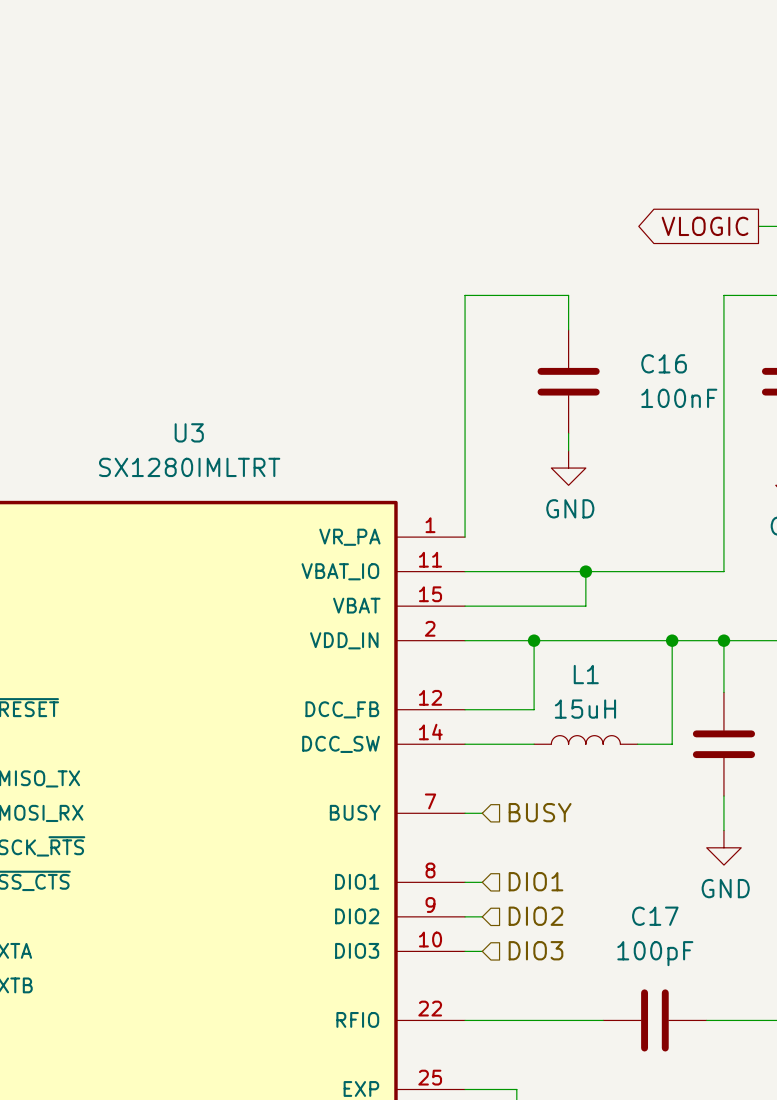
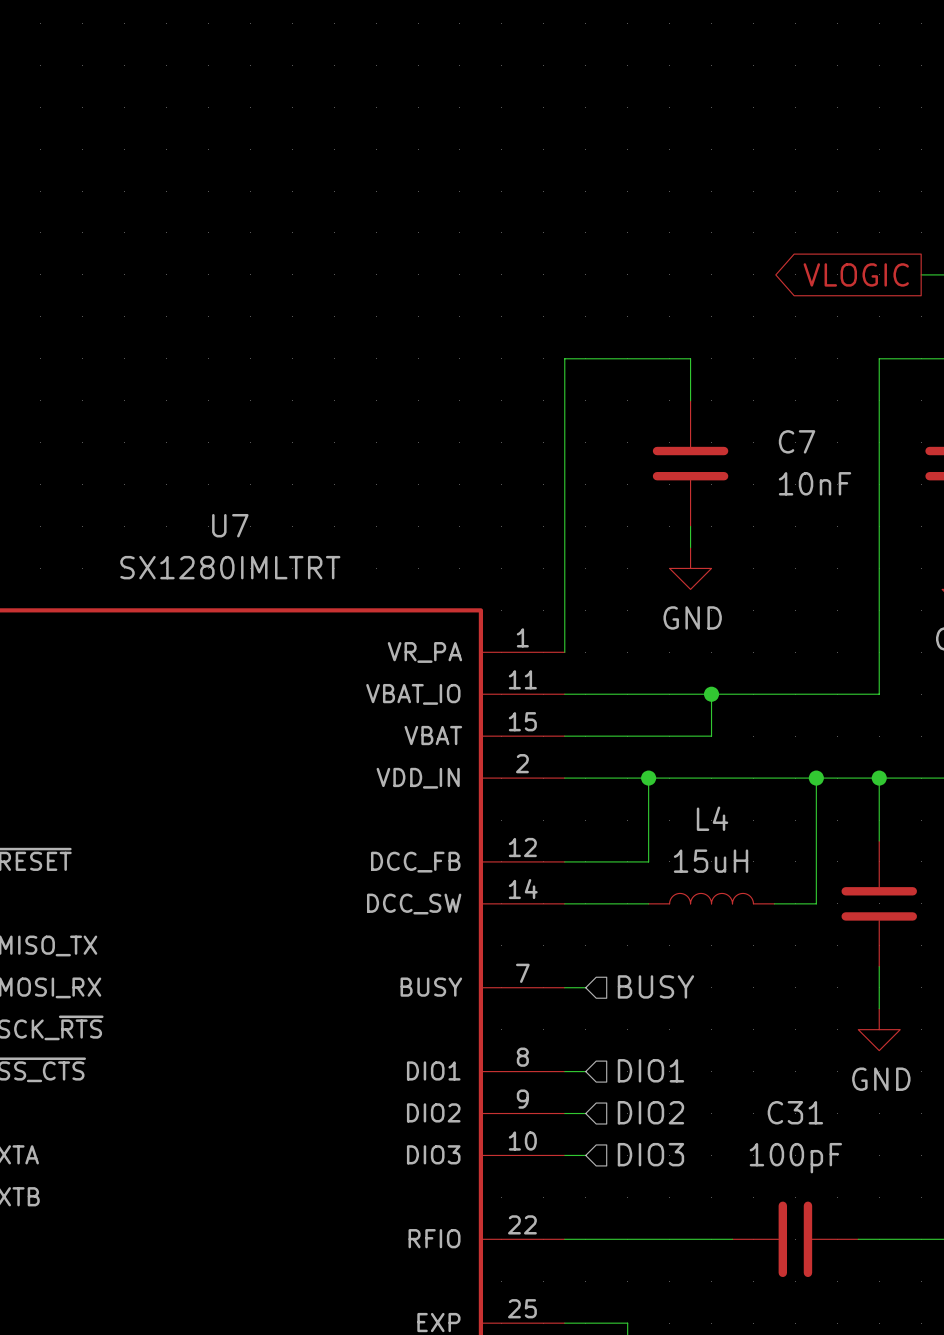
C16 name: C16 (664, 363) -> C7 (797, 441)
C16 value: 100nF (679, 398) -> 10nF (815, 483)
U3 name: U3 (189, 432) -> U7 (230, 525)
L1 name: L1 (586, 674) -> L4 (712, 818)
C17 name: C17 (655, 916) -> C31 (795, 1112)

